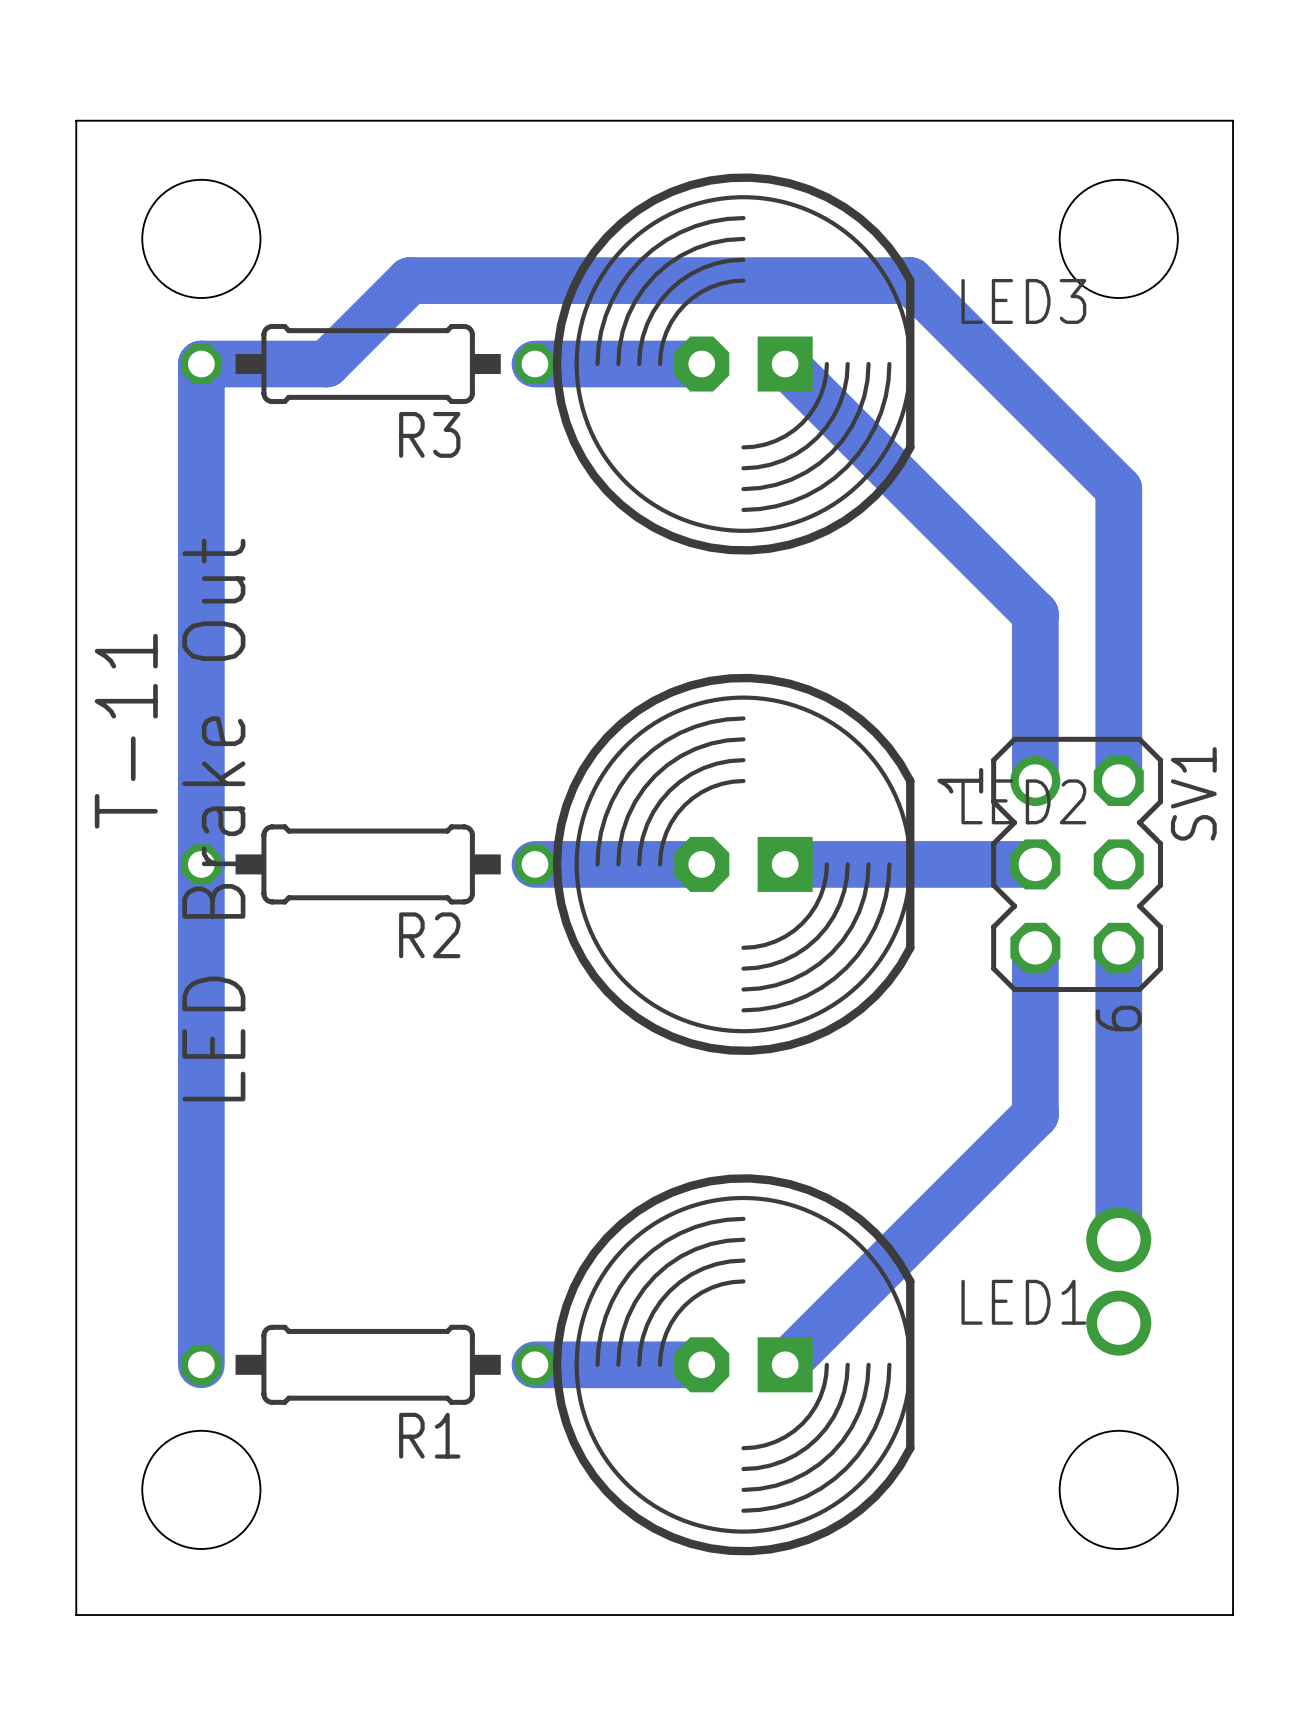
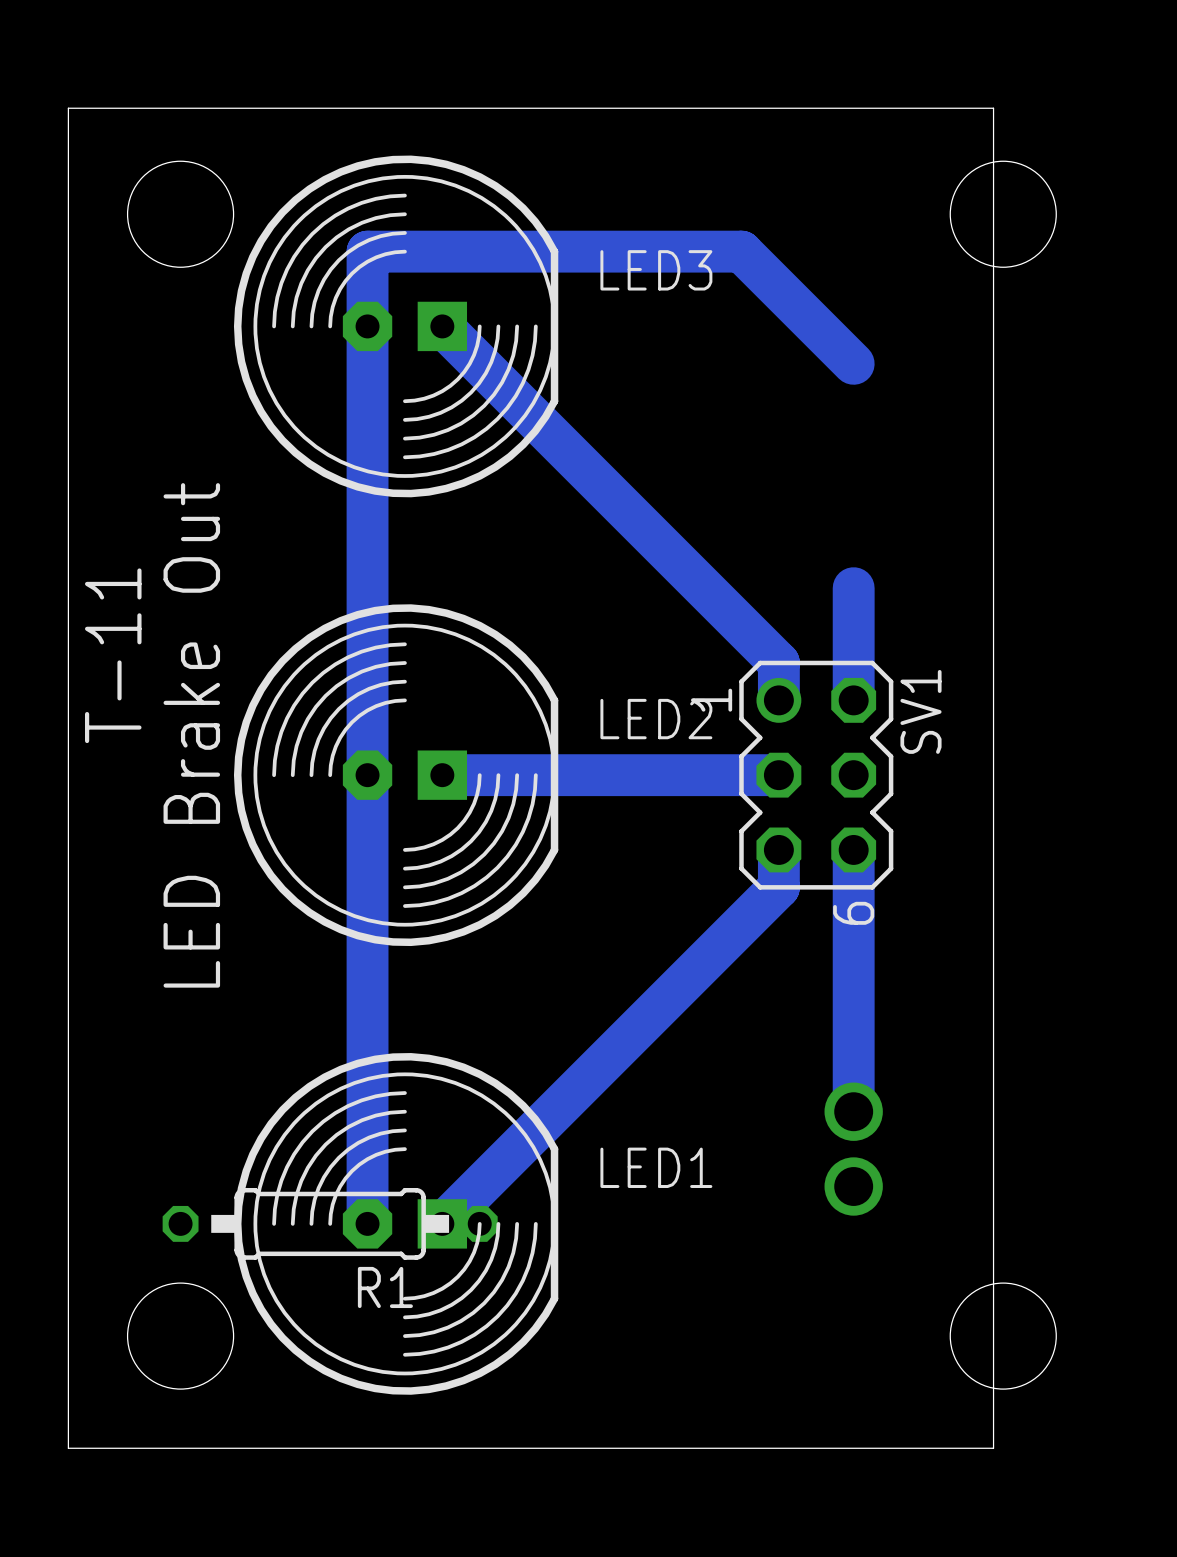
board edge: (1107, 120) (1233, 120) (1233, 1615) (1107, 1615) -> (993, 108) (993, 1448)
bottom track: (409, 280) (326, 364) (201, 364) (201, 1364) -> (367, 251) (367, 1223)
bottom track: (826, 280) (910, 280) (1118, 489) (1118, 781) -> (741, 251) (853, 363)
R3: (368, 364) -> none
bottom track: none -> (442, 326) (778, 662) (778, 700)
bottom track: (534, 364) (701, 364) -> none
LED3 position: (733, 364) -> (396, 326)
bottom track: (785, 364) (1035, 614) (1035, 781) -> none
bottom track: none -> (853, 588) (853, 700)
R2: (368, 864) -> none
bottom track: none -> (629, 775) (704, 775)
LED2 position: (733, 864) -> (396, 775)
bottom track: (868, 864) (1035, 864) -> none
SV1 position: (1077, 864) -> (816, 775)
bottom track: none -> (778, 849) (778, 887) (442, 1223)
bottom track: (1035, 947) (1035, 1114) (785, 1364) -> none
bottom track: (1118, 947) (1118, 1239) -> (853, 849) (853, 1111)
part position: (1118, 1281) -> (853, 1149)
bottom track: (534, 1364) (701, 1364) -> none
LED1 position: (733, 1364) -> (396, 1223)

